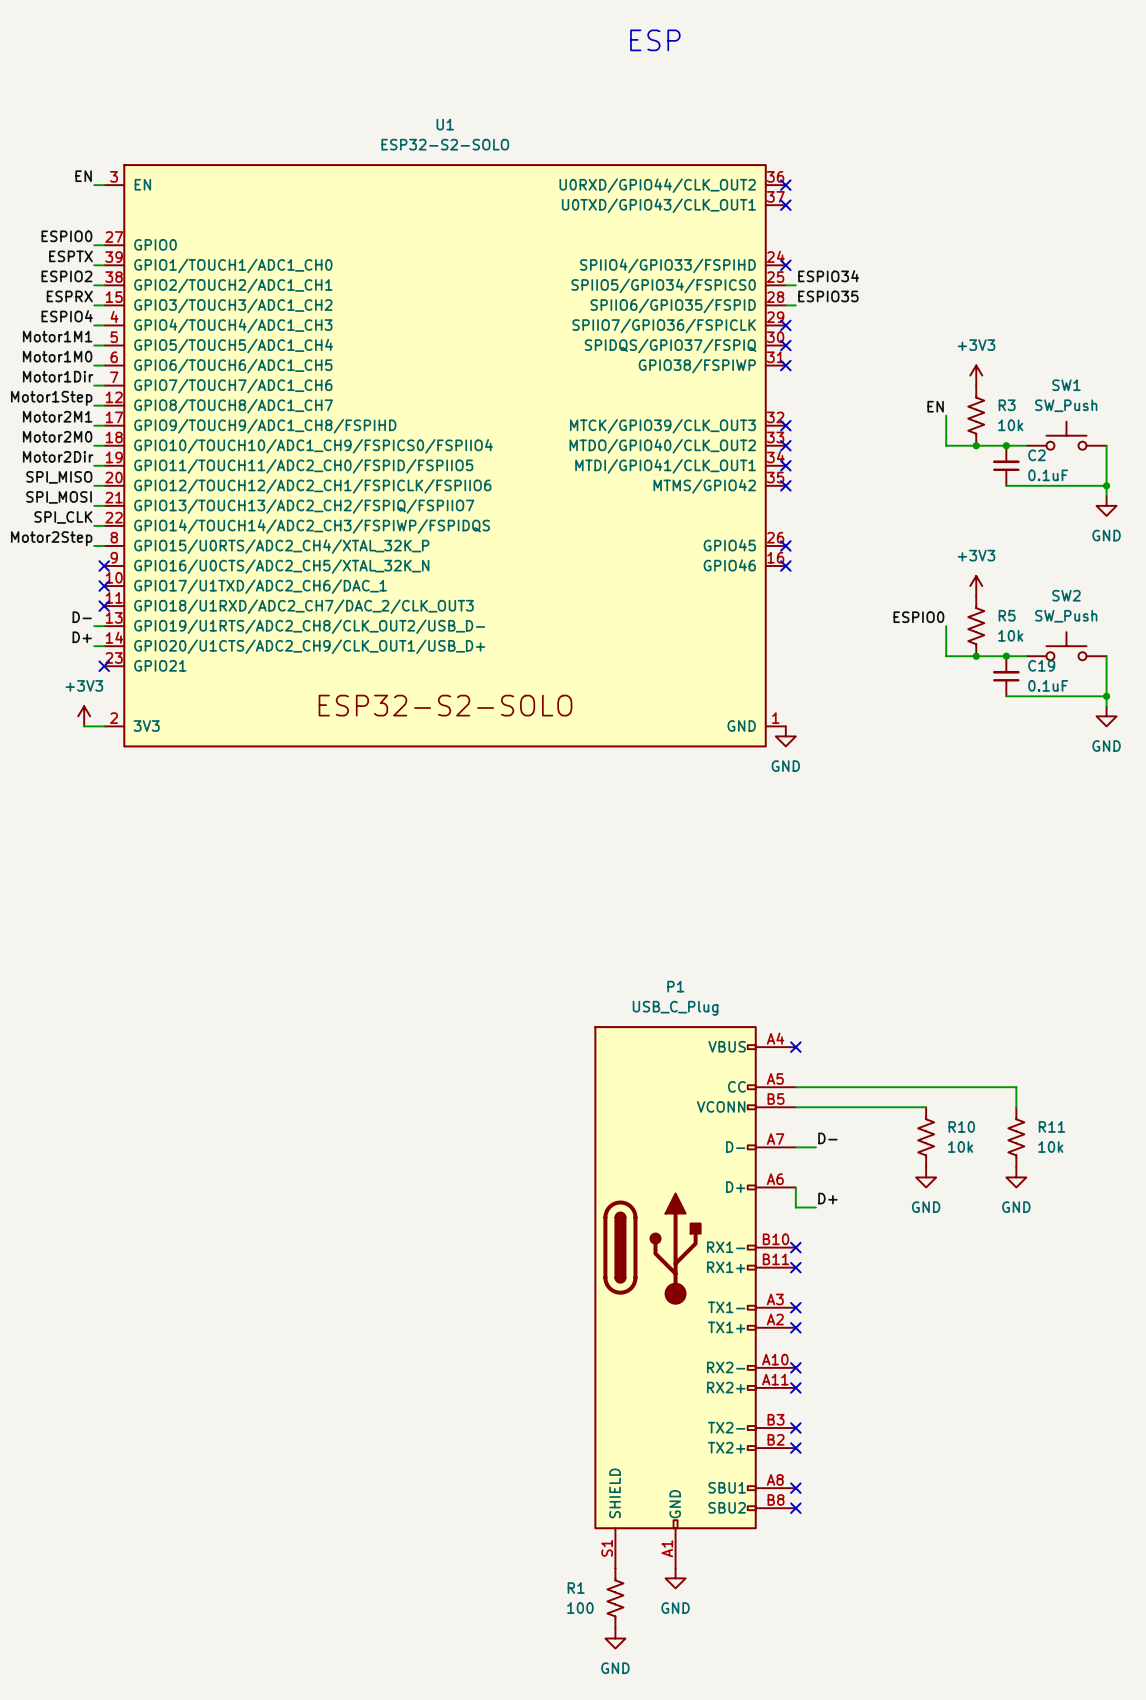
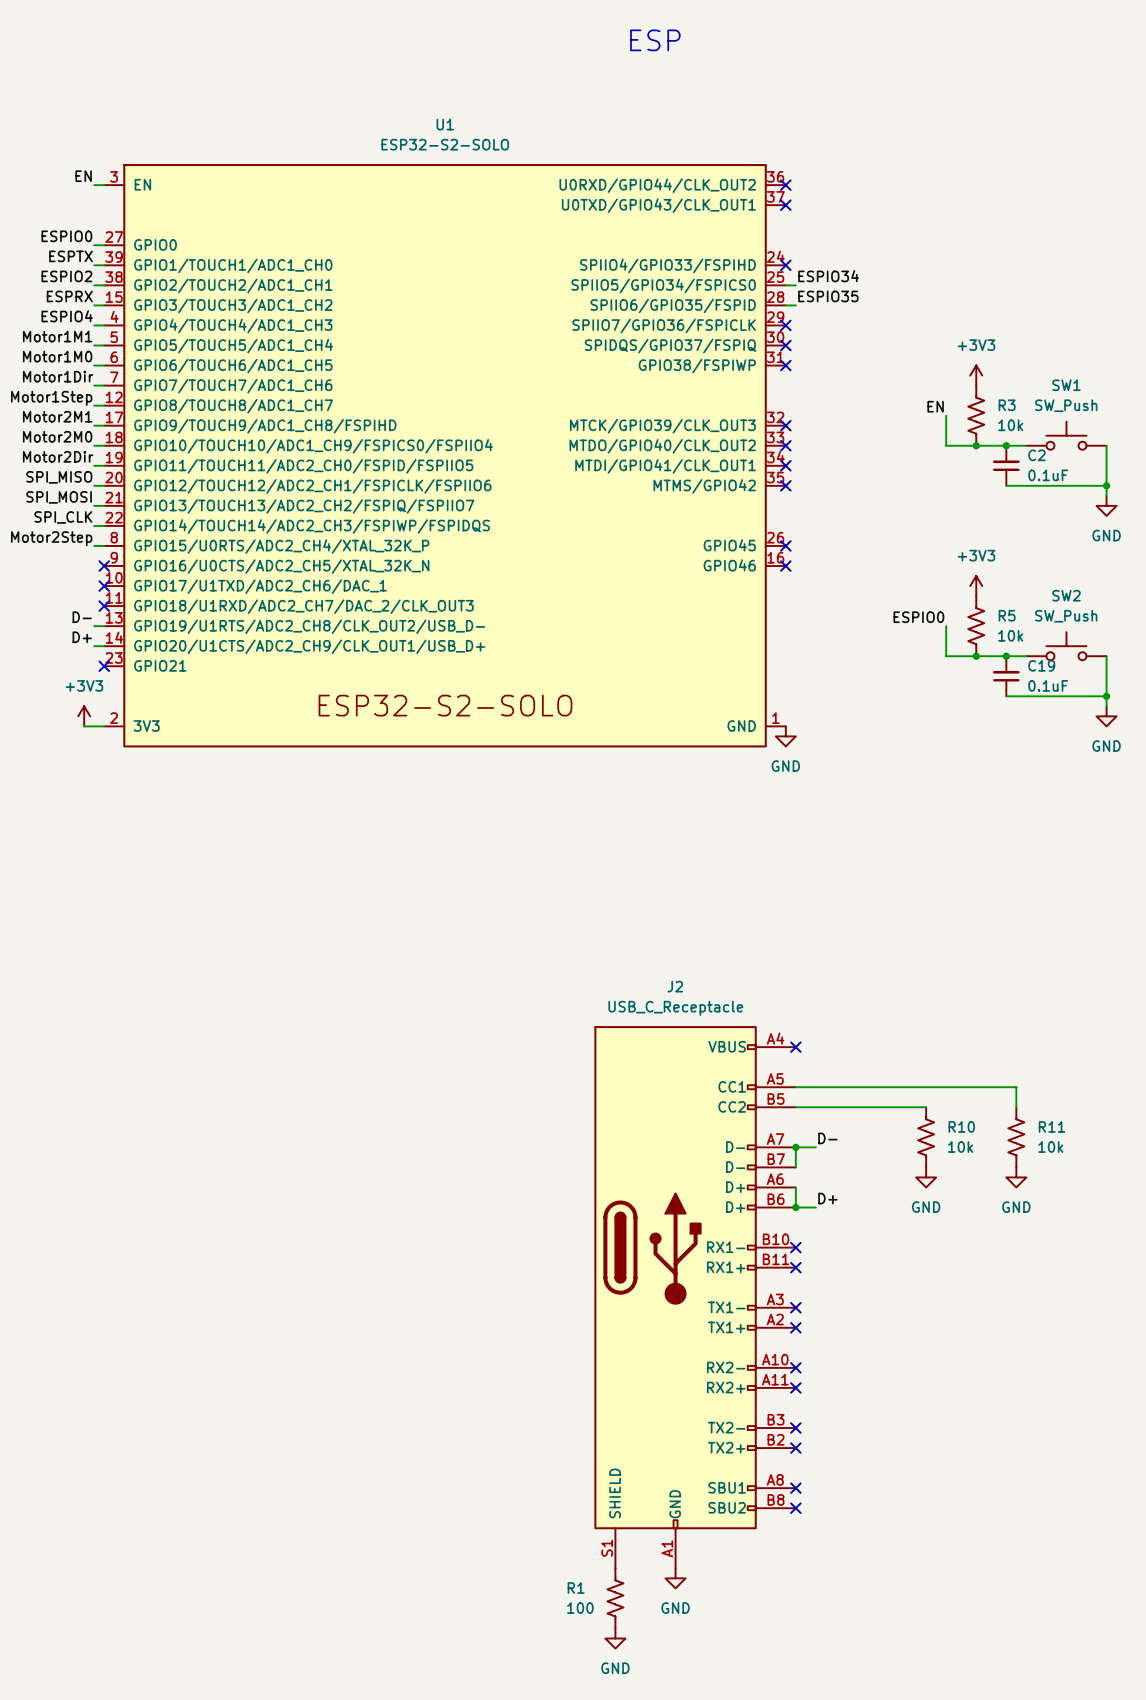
wire: none -> (795, 1147) (795, 1167)
junction: none -> (795, 1147)
junction: none -> (795, 1207)
P1: USB_C_Plug (695, 1297) -> none
J2: none -> USB_C_Receptacle (695, 1297)

